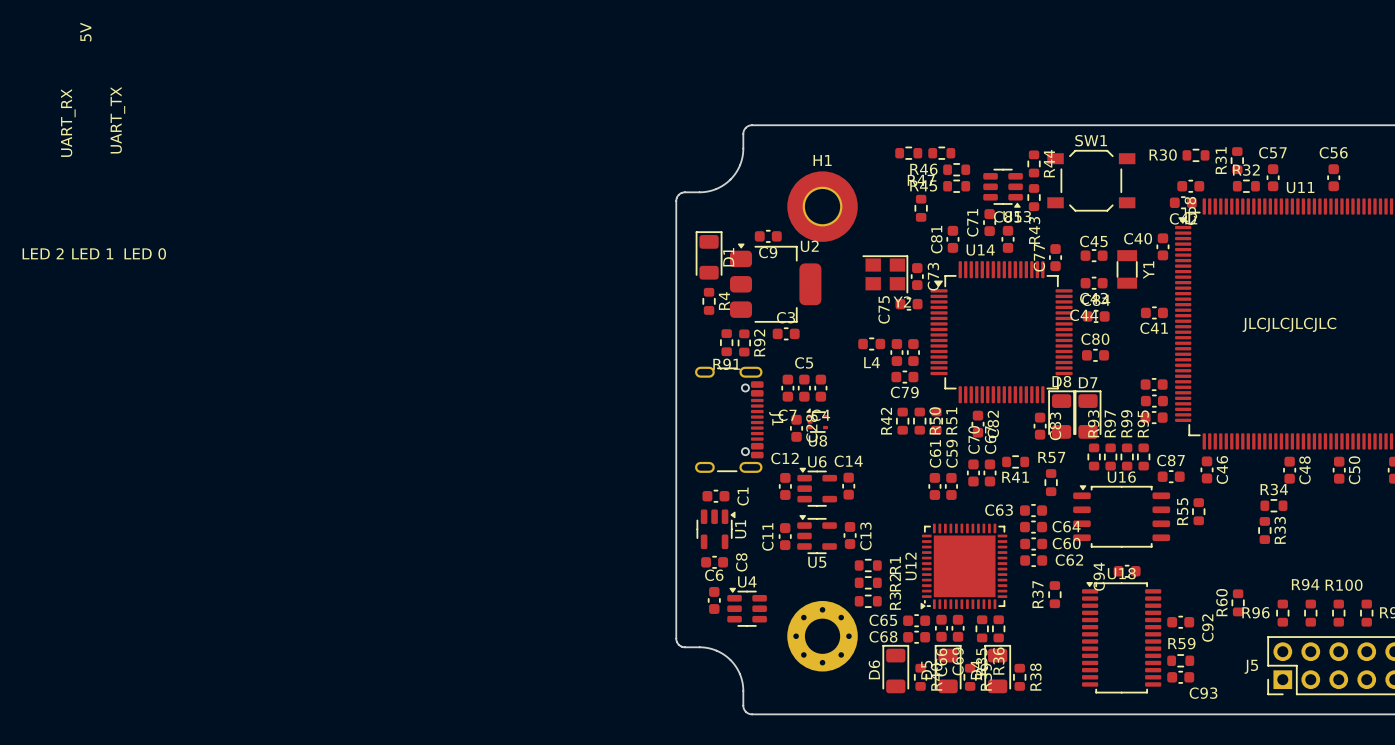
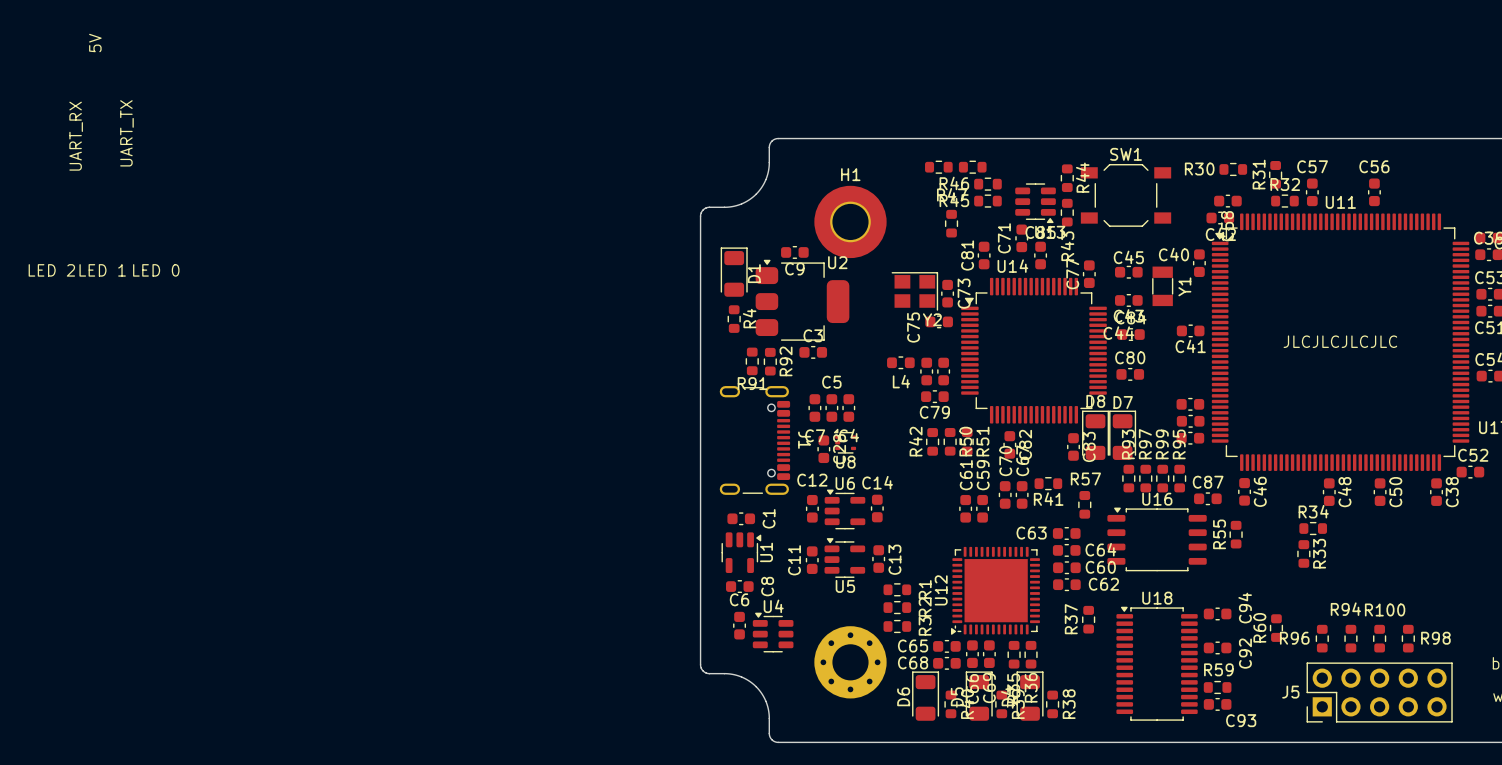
C94 position: (1127, 571) -> (1217, 613)
C94 name position: C94 (1099, 576) -> C94 (1245, 608)

